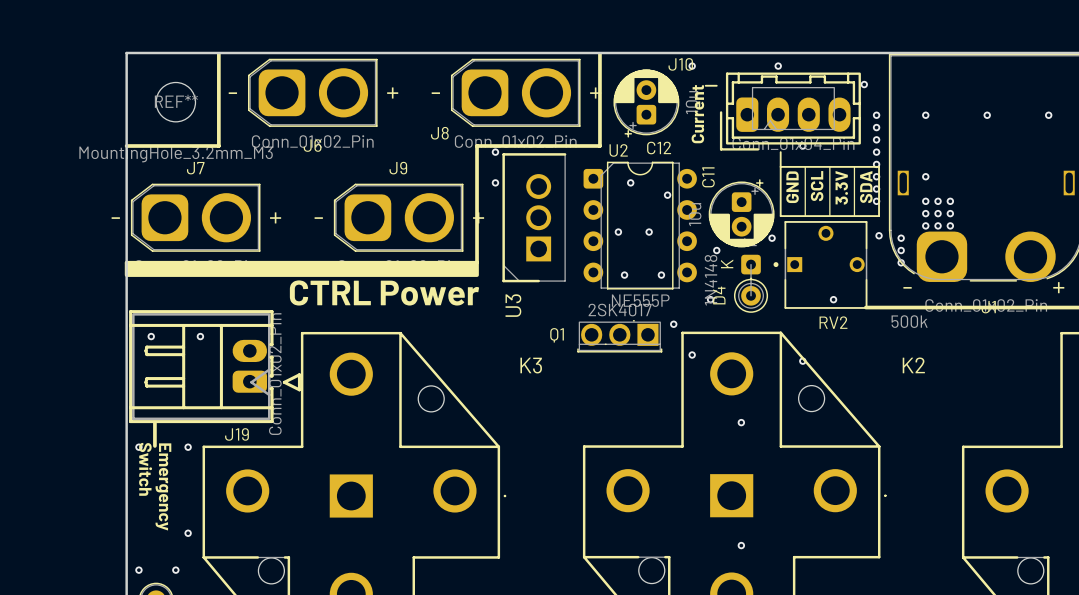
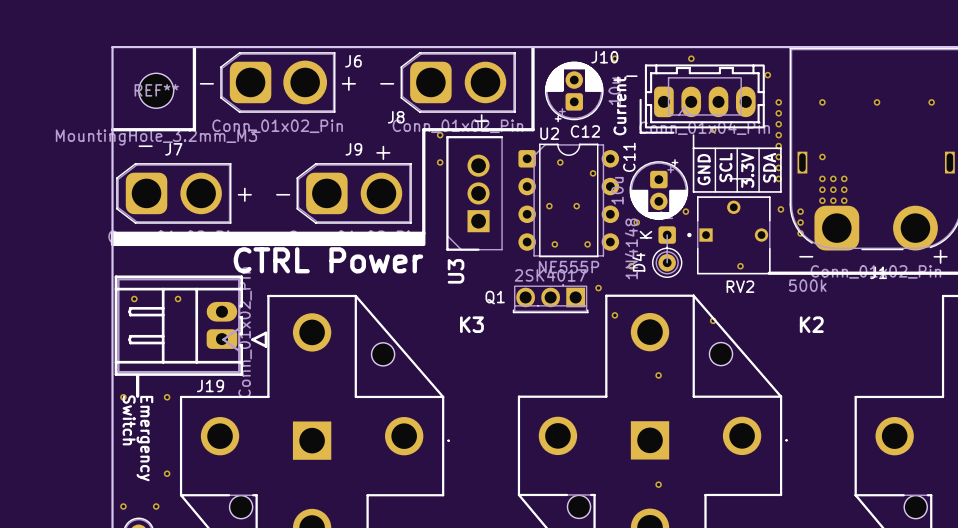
J8 footprint: [450, 58, 581, 127] -> [400, 52, 516, 113]
J6 name position: J6 (312, 145) -> J6 (353, 61)
J7 footprint: [130, 183, 261, 252] -> [116, 163, 232, 224]
J9 footprint: [333, 183, 464, 252] -> [296, 163, 412, 224]
line: none -> (729, 178) (751, 178)

